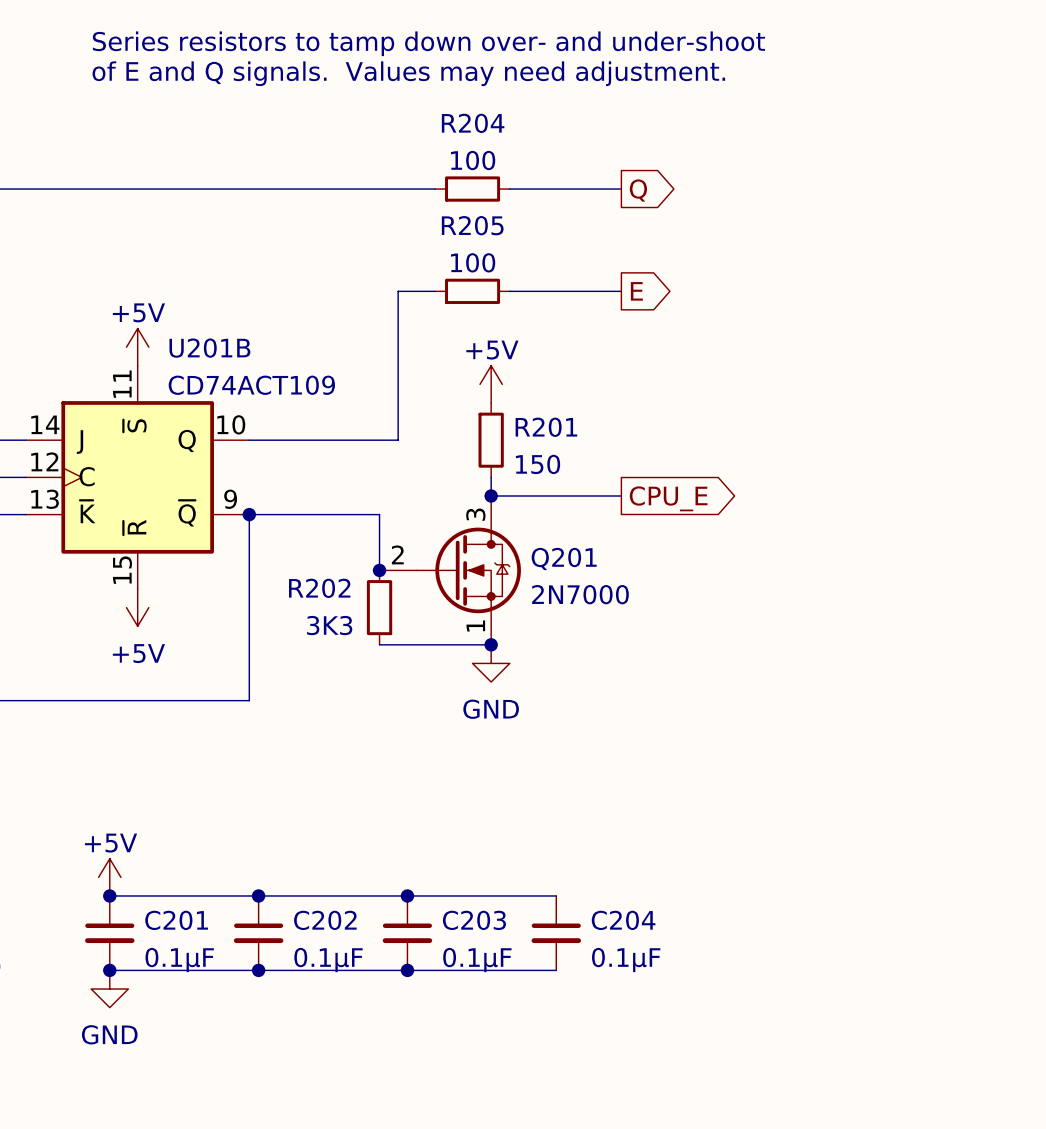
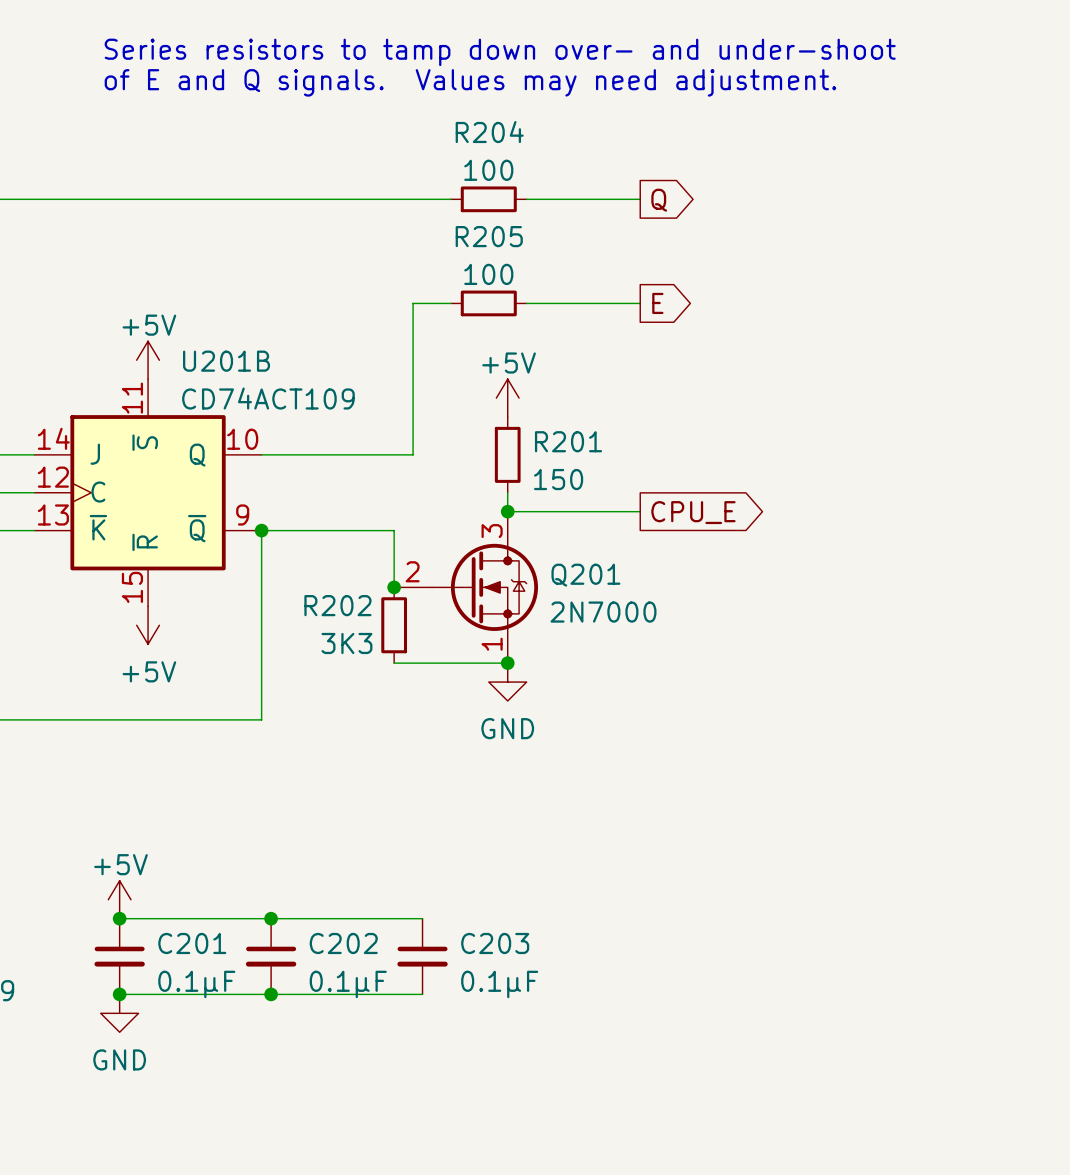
wire: (407, 895) (556, 895) -> none
junction: (407, 895) -> none
C204: 0.1µF (556, 933) -> none
wire: (407, 970) (556, 970) -> none
junction: (407, 970) -> none

